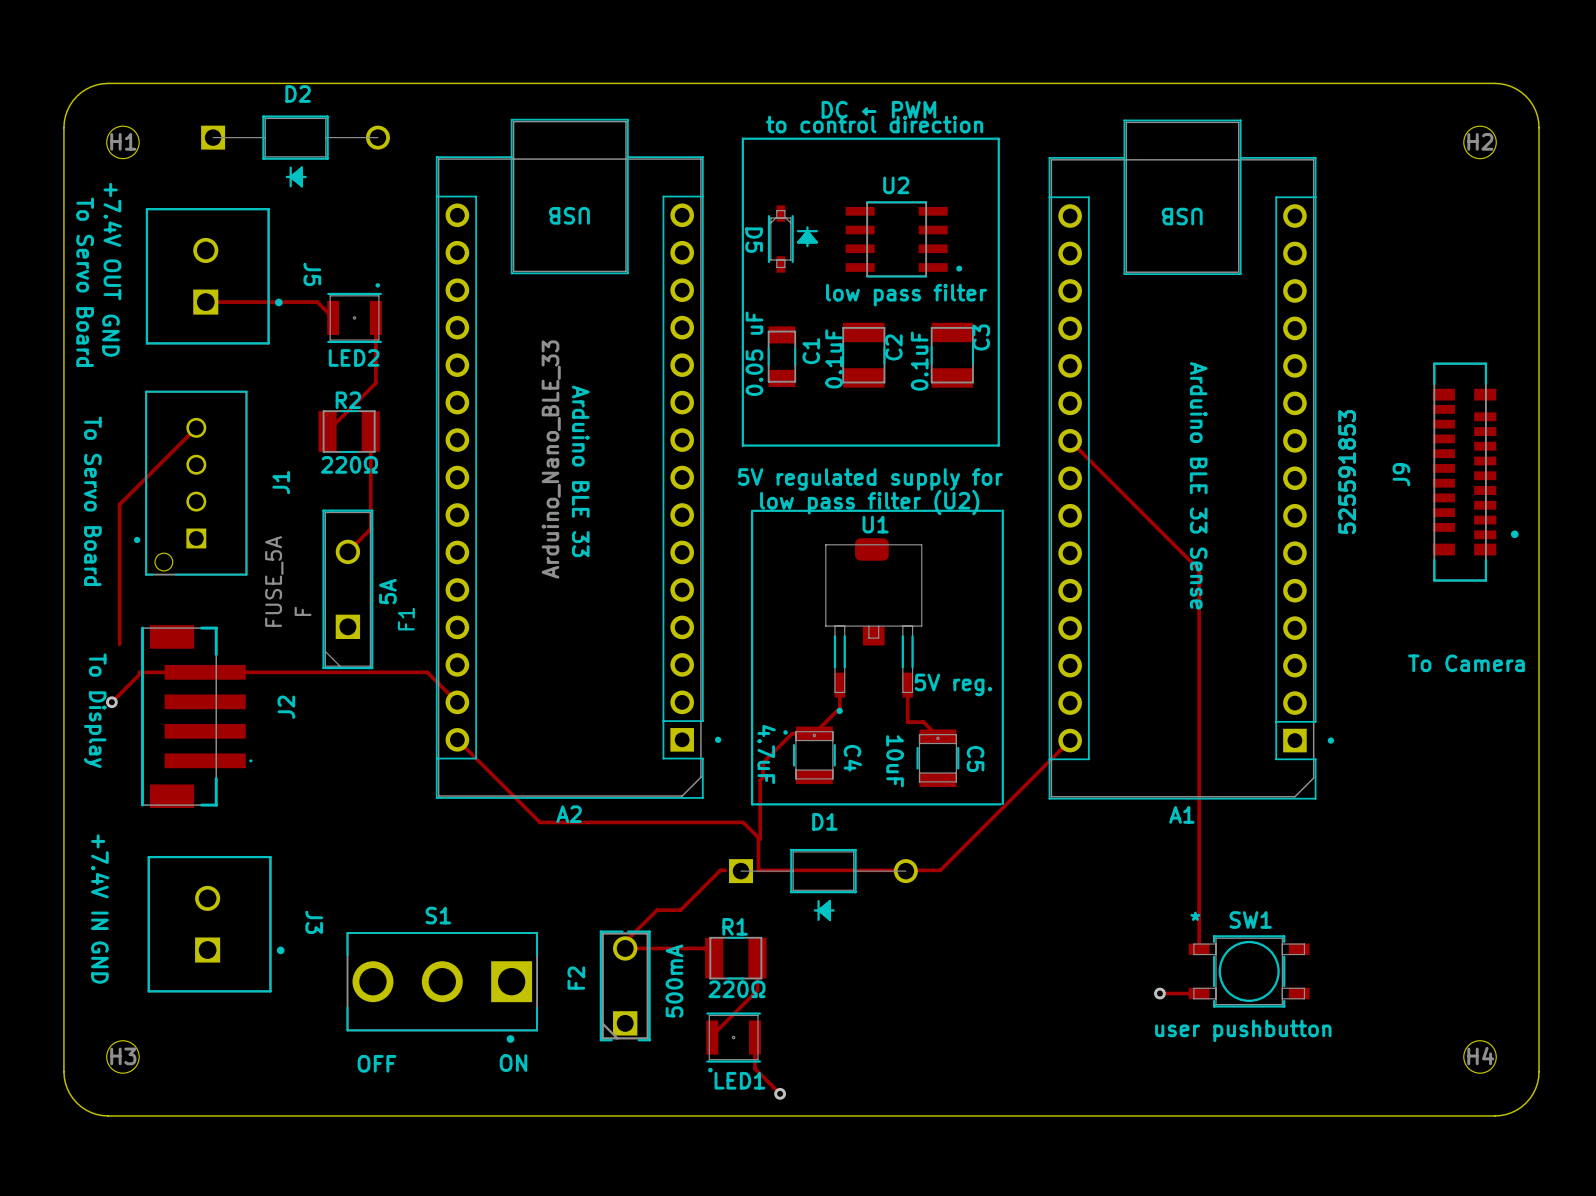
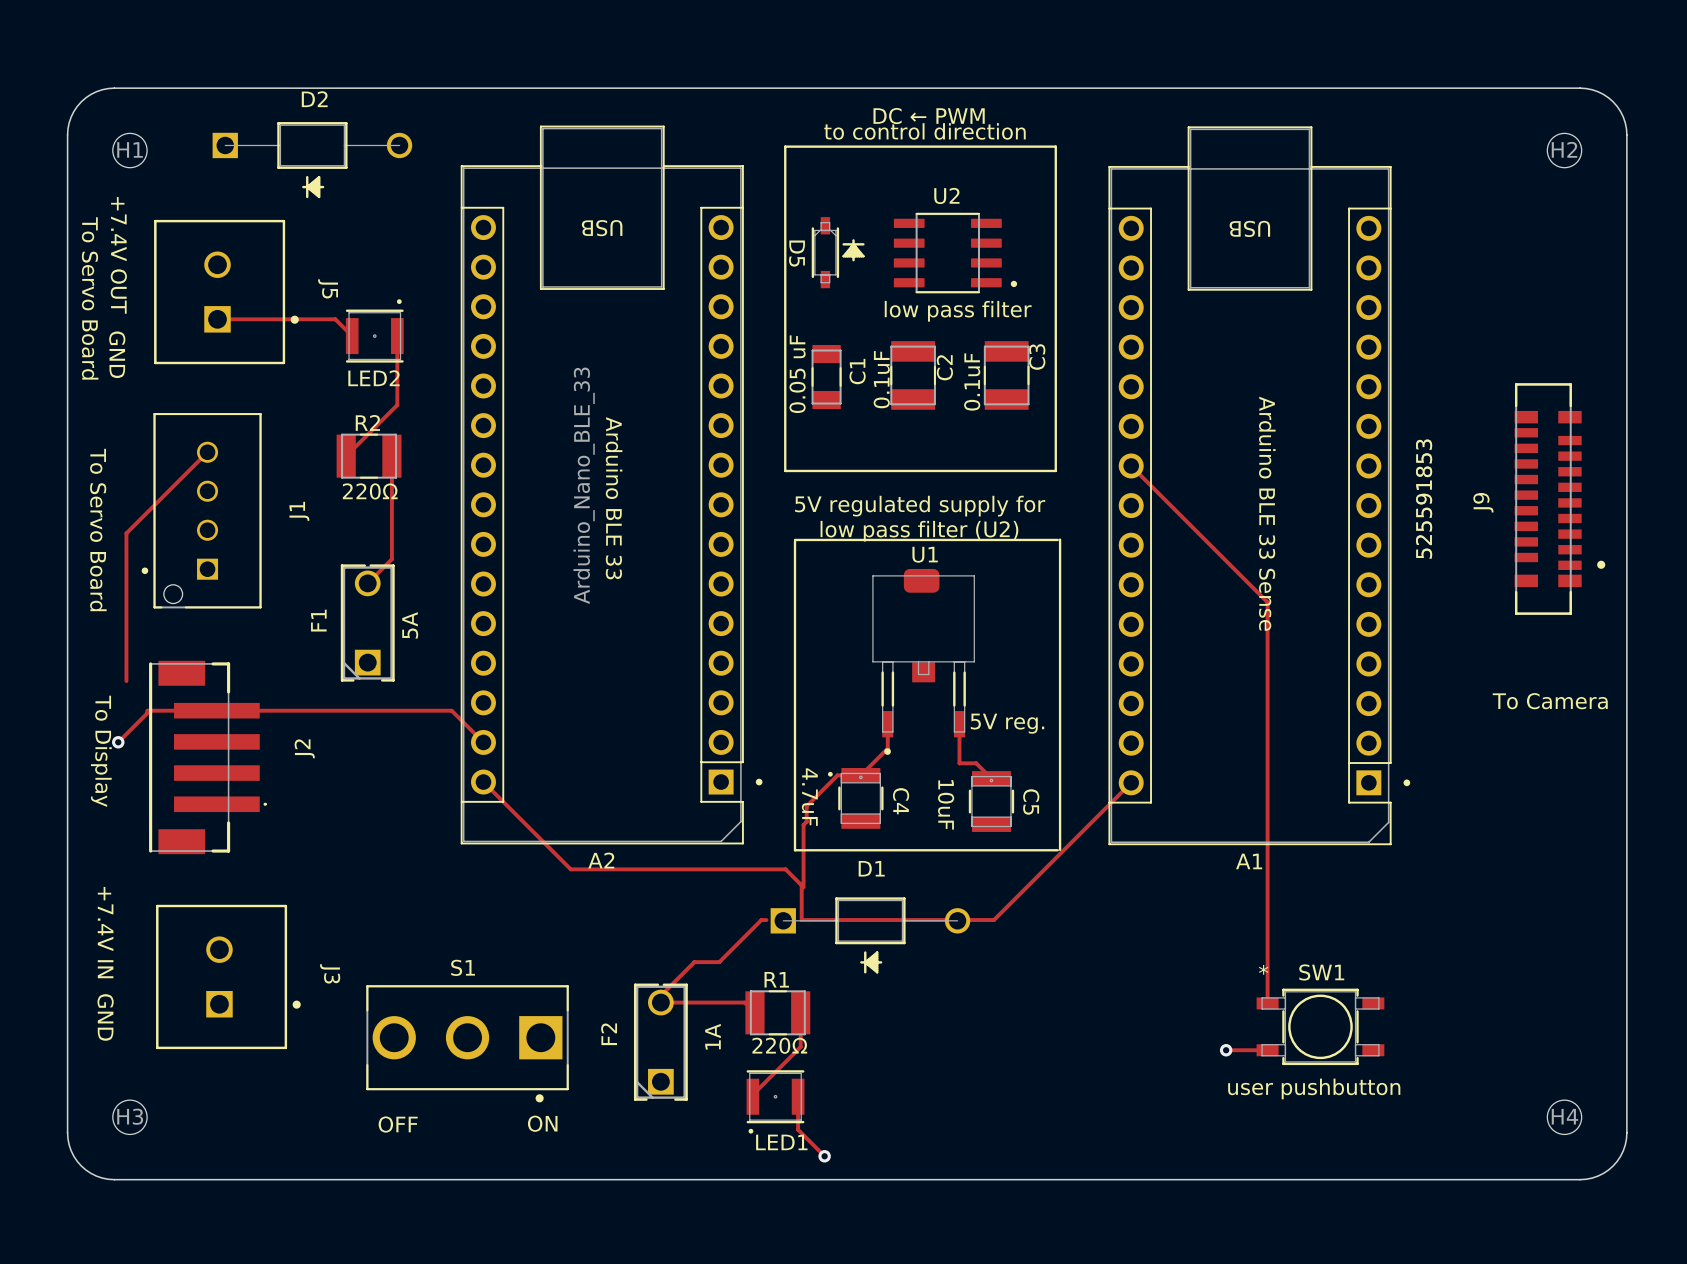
F1 footprint: [322, 509, 374, 670] -> [340, 564, 395, 682]
F1 value: FUSE_5A (274, 581) -> none
F1 name position: F1 (406, 619) -> F1 (318, 620)
F2 text: 500mA (674, 981) -> 1A (712, 1036)

